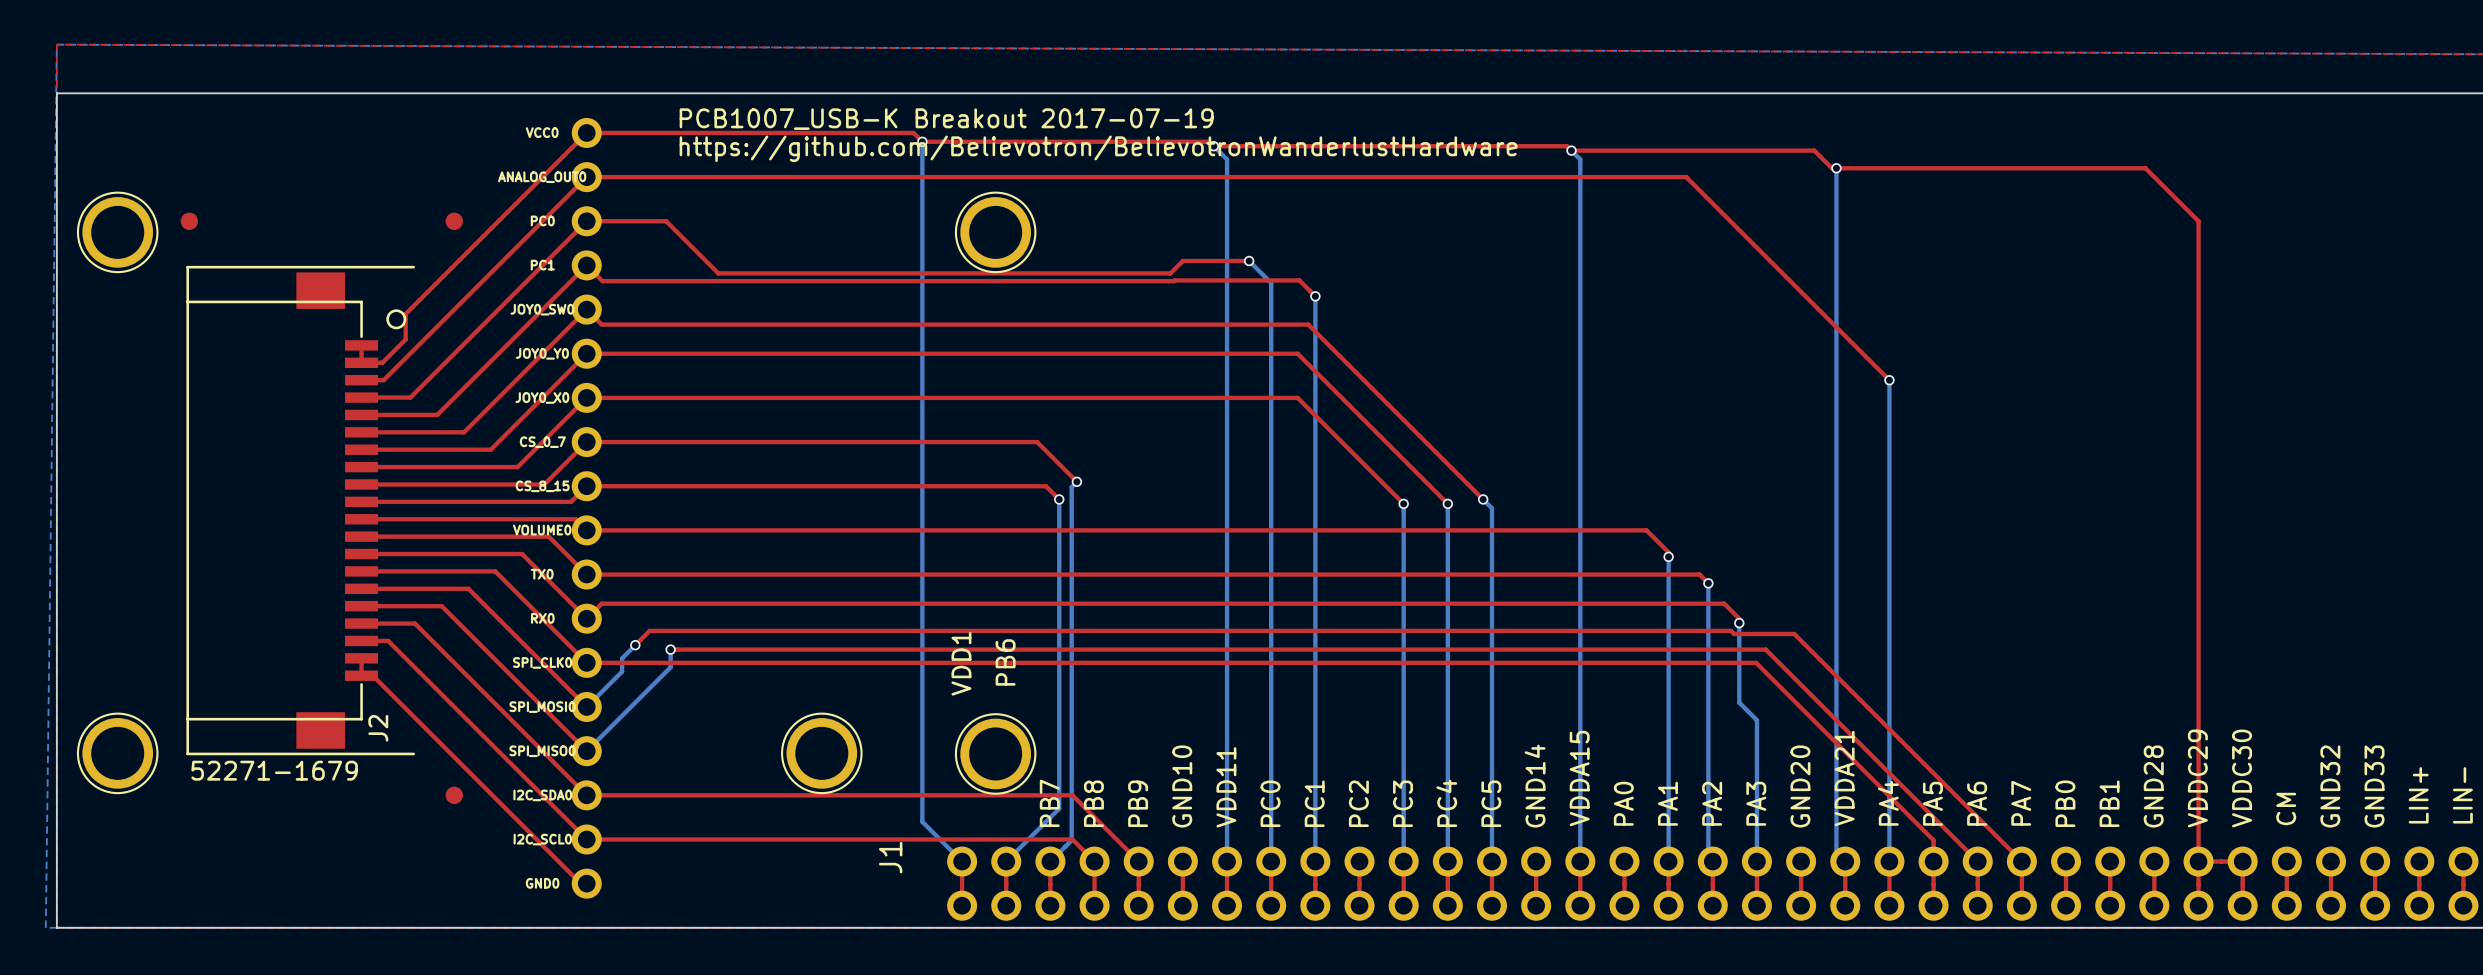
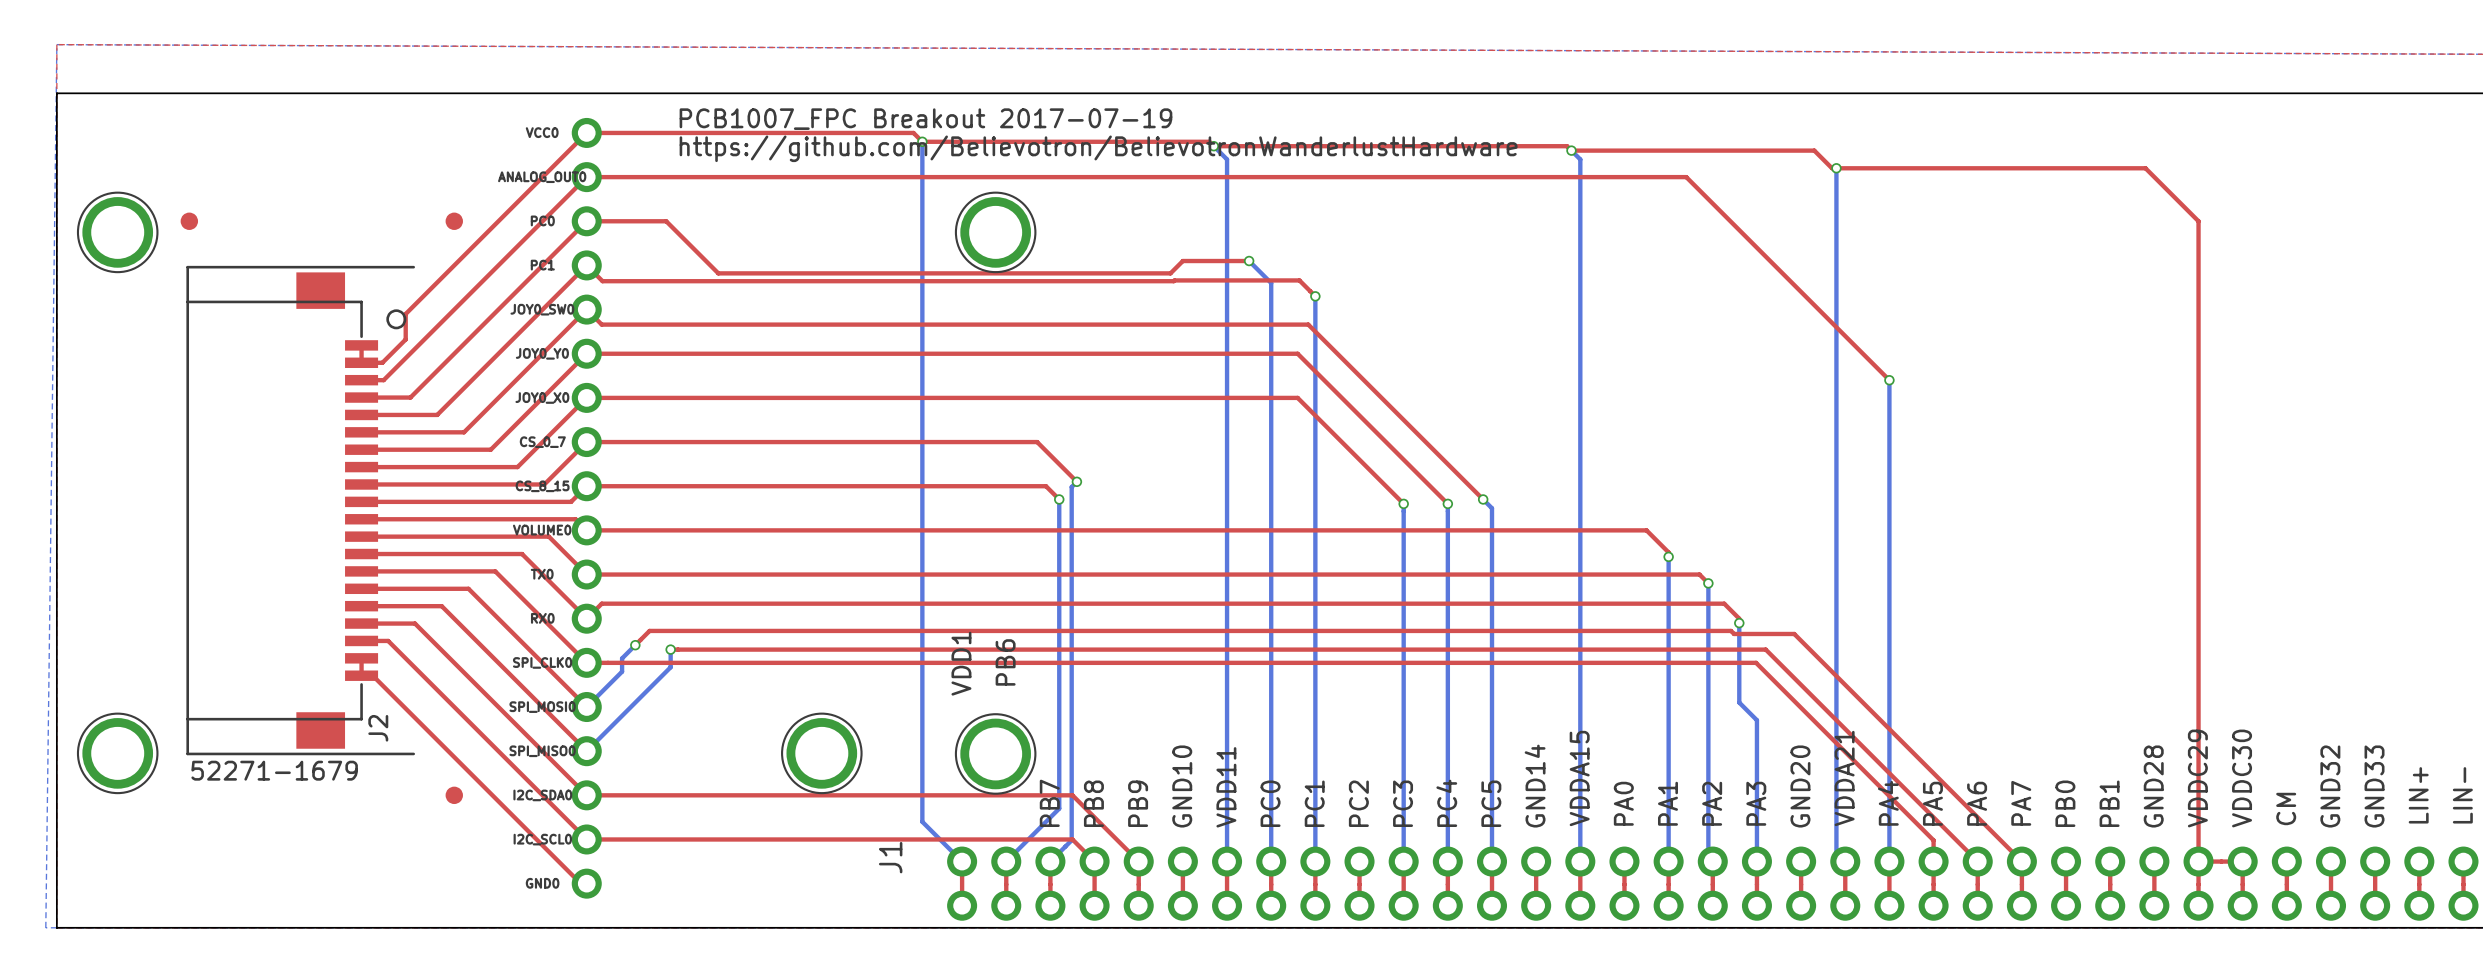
text: PCB1007_USB-K Breakout 2017-07-19 (946, 119) -> PCB1007_FPC Breakout 2017-07-19 (925, 119)

